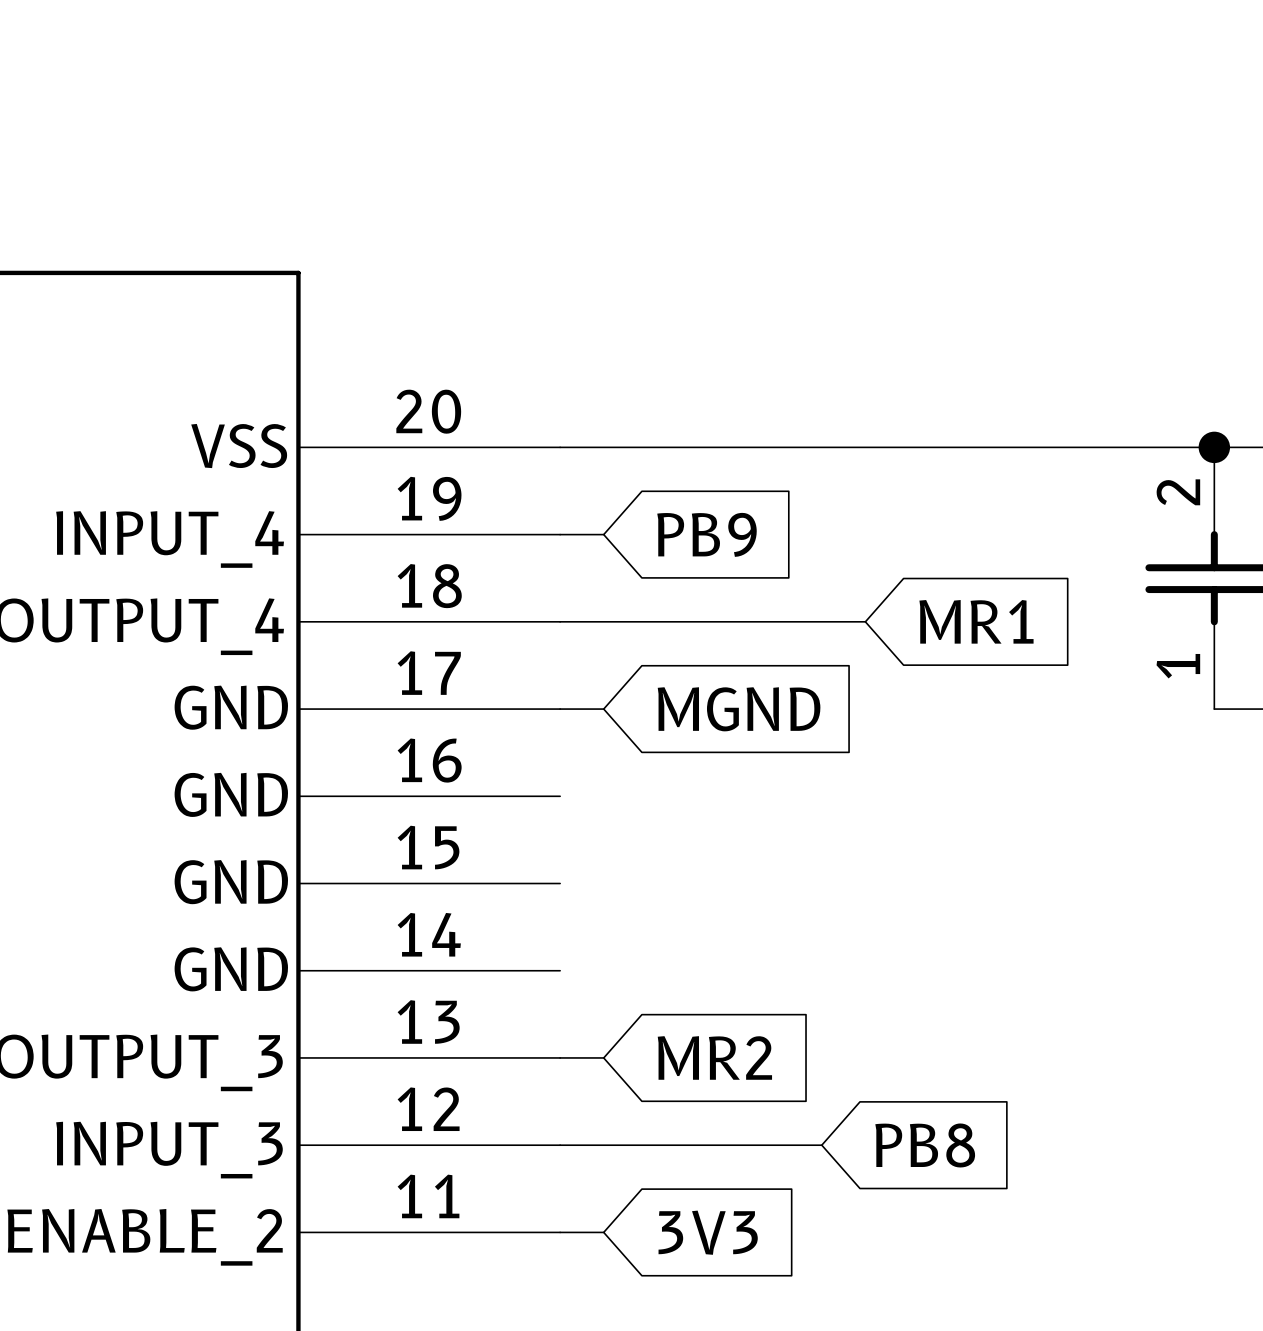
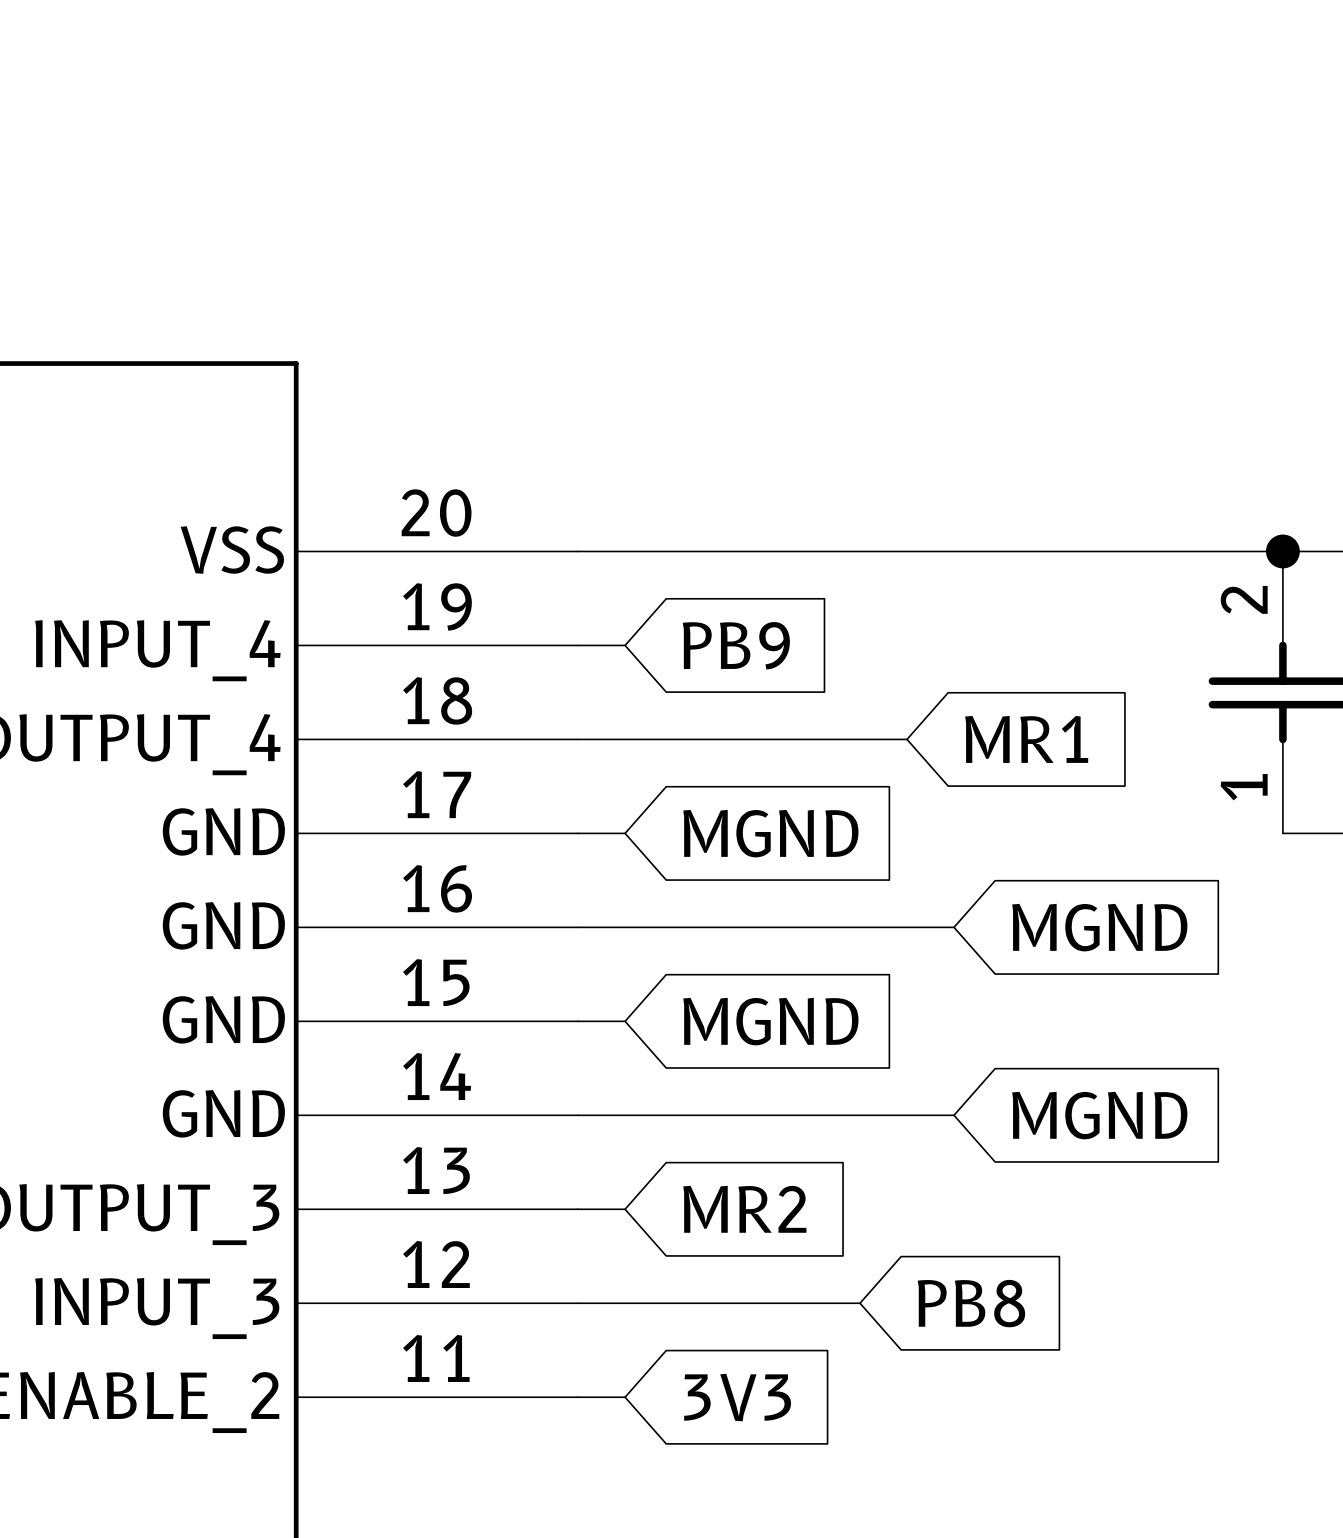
wire: none -> (578, 927) (954, 927)
global label: none -> MGND (1099, 927)
wire: none -> (578, 1021) (625, 1021)
global label: none -> MGND (770, 1021)
wire: none -> (578, 1115) (954, 1115)
global label: none -> MGND (1099, 1115)

